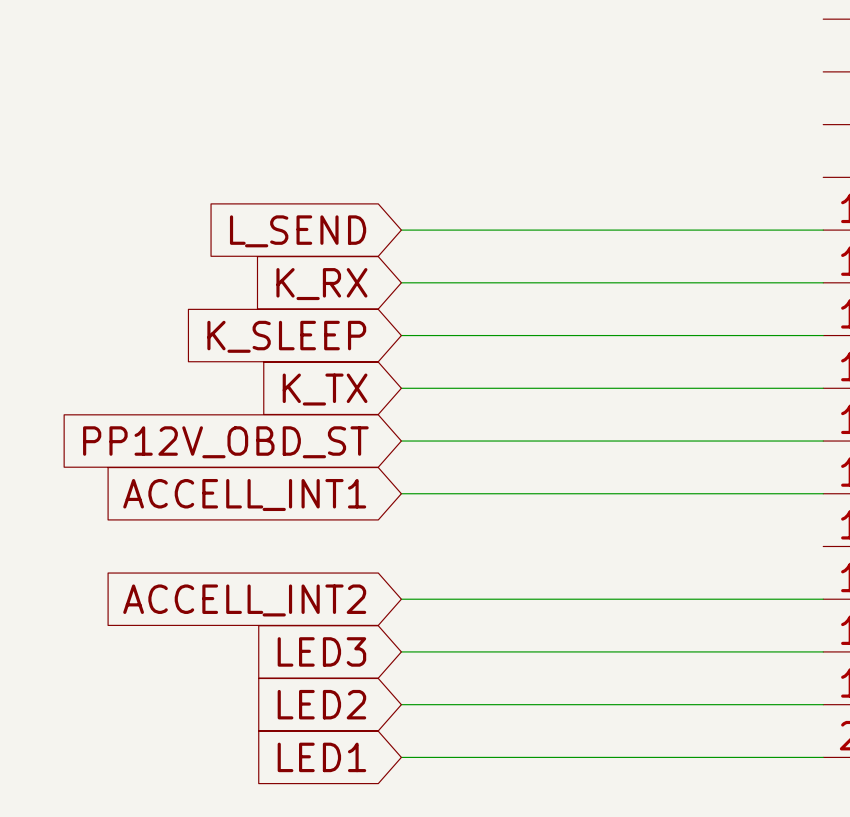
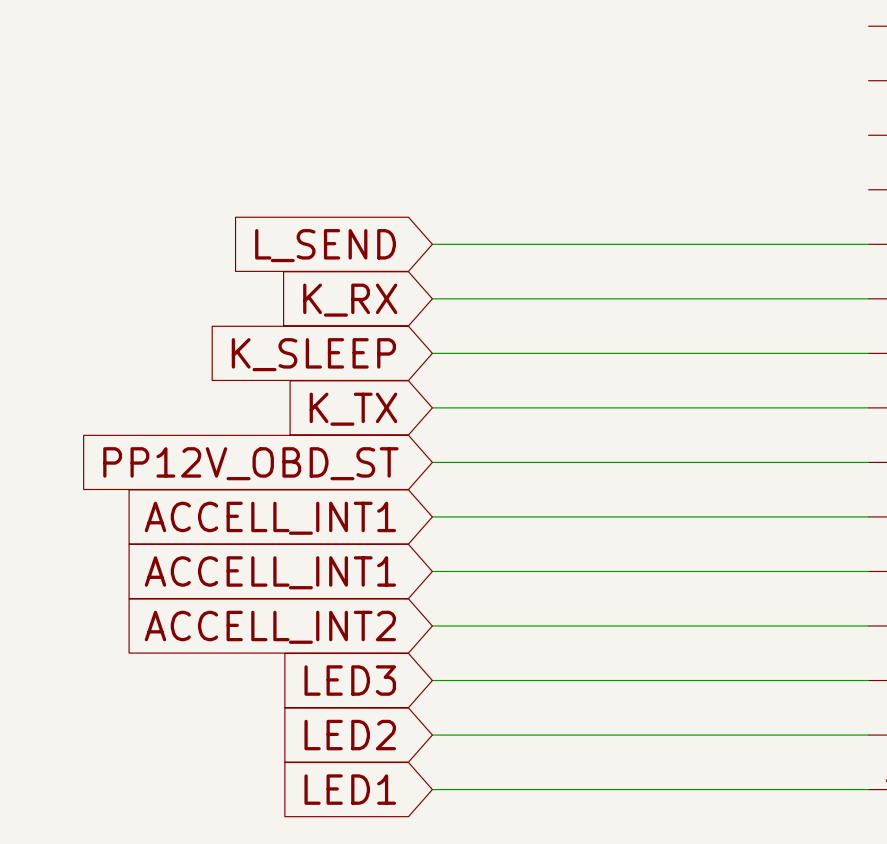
wire: none -> (432, 571) (868, 571)
global label: none -> ACCELL_INT1 (270, 572)

